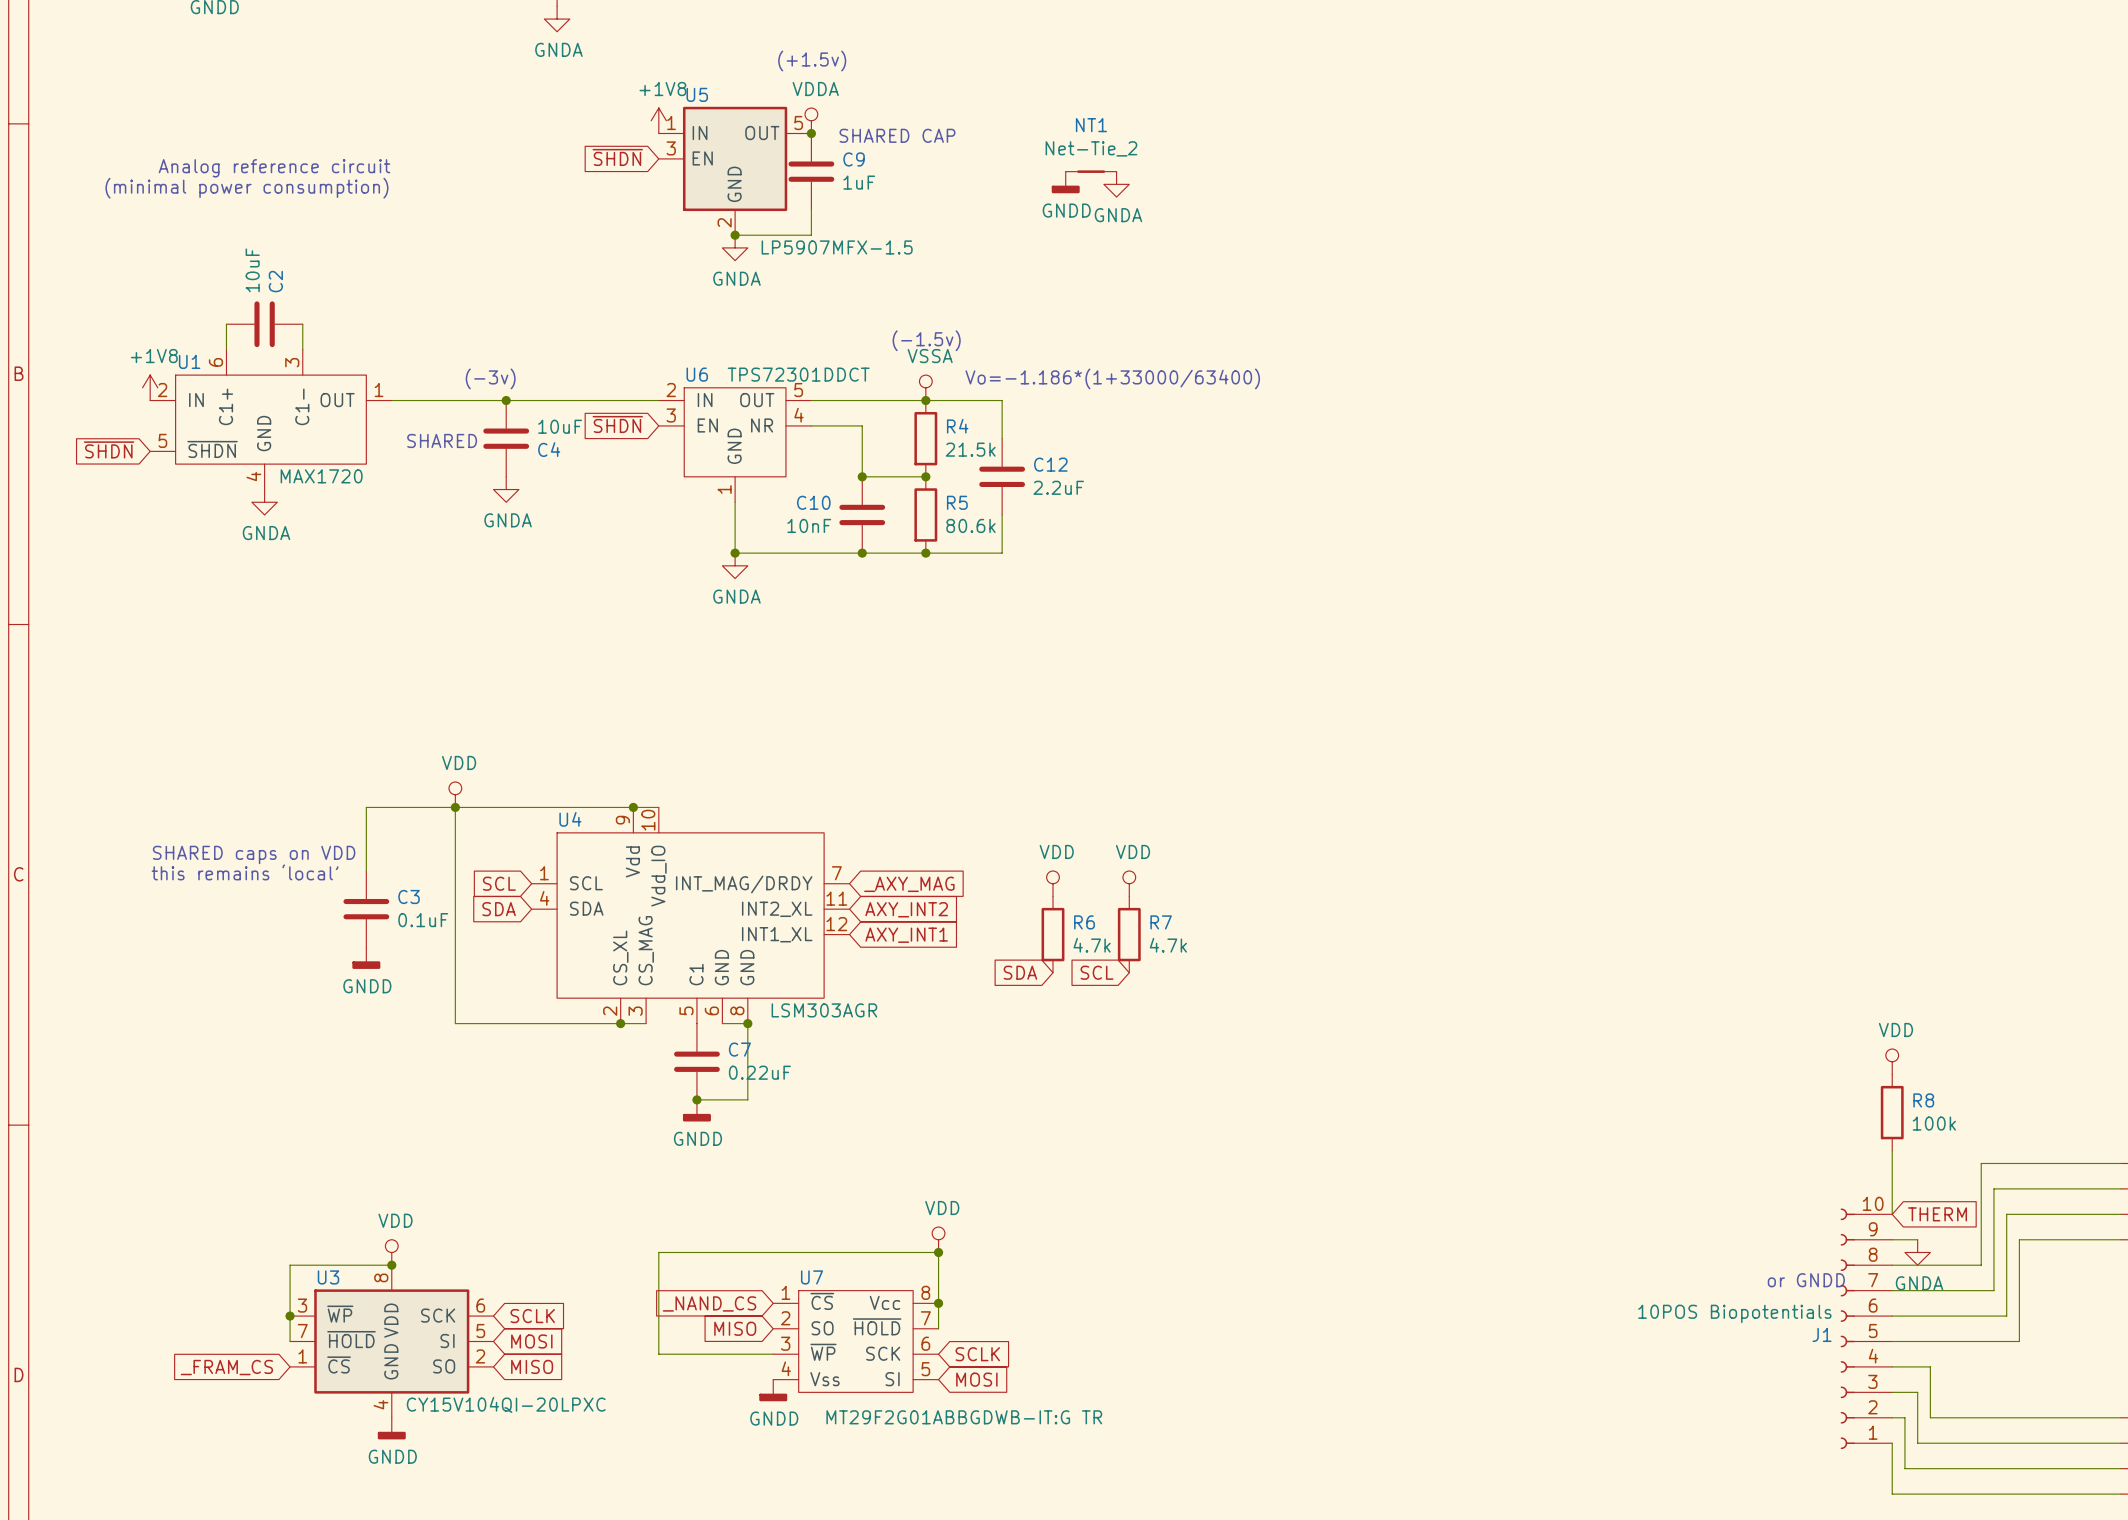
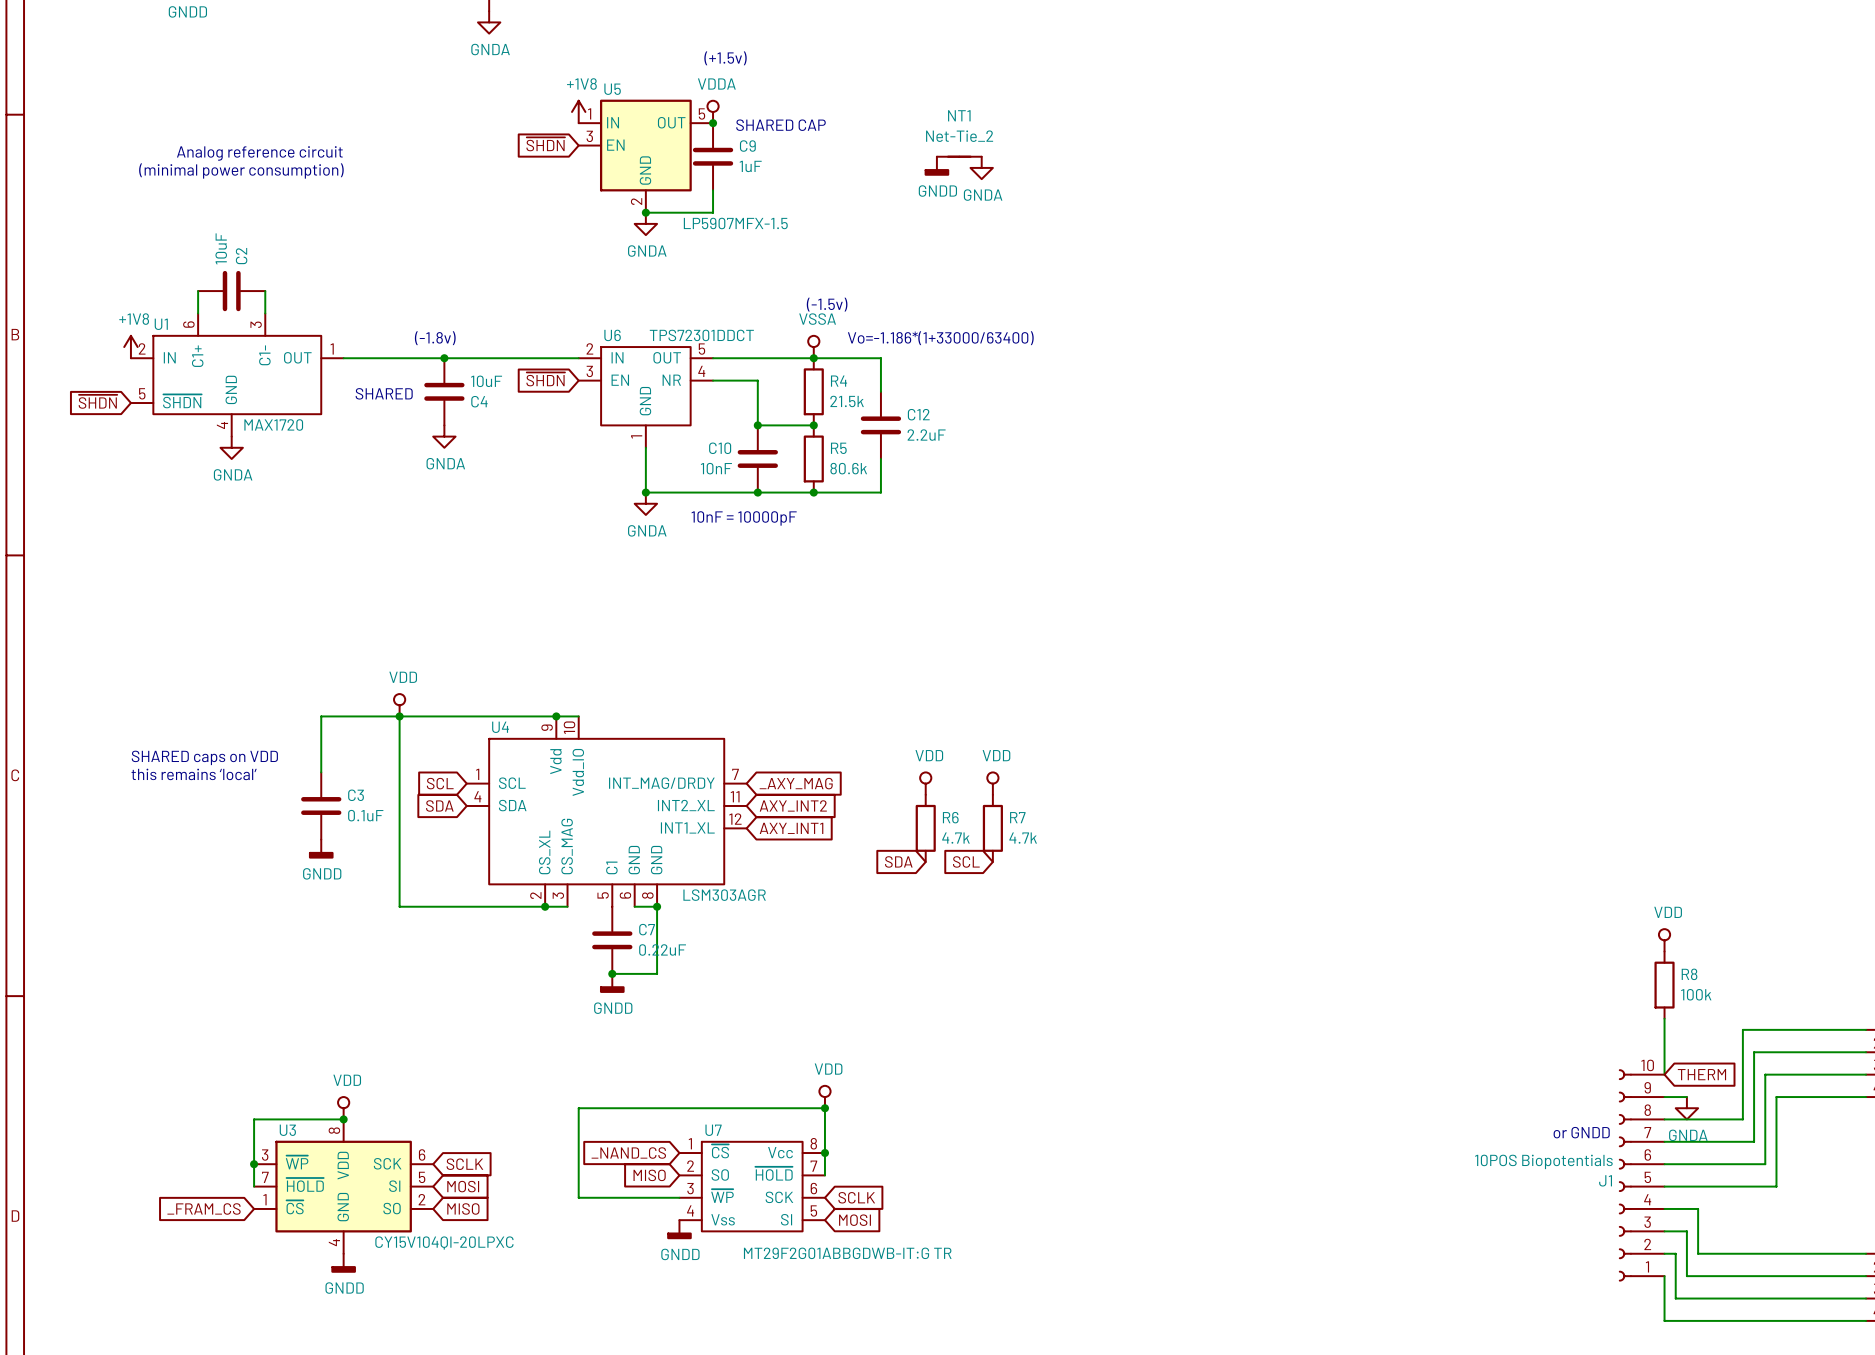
text: (-3v) (490, 378) -> (-1.8v) (435, 338)
text: none -> 10nF = 10000pF (744, 518)

